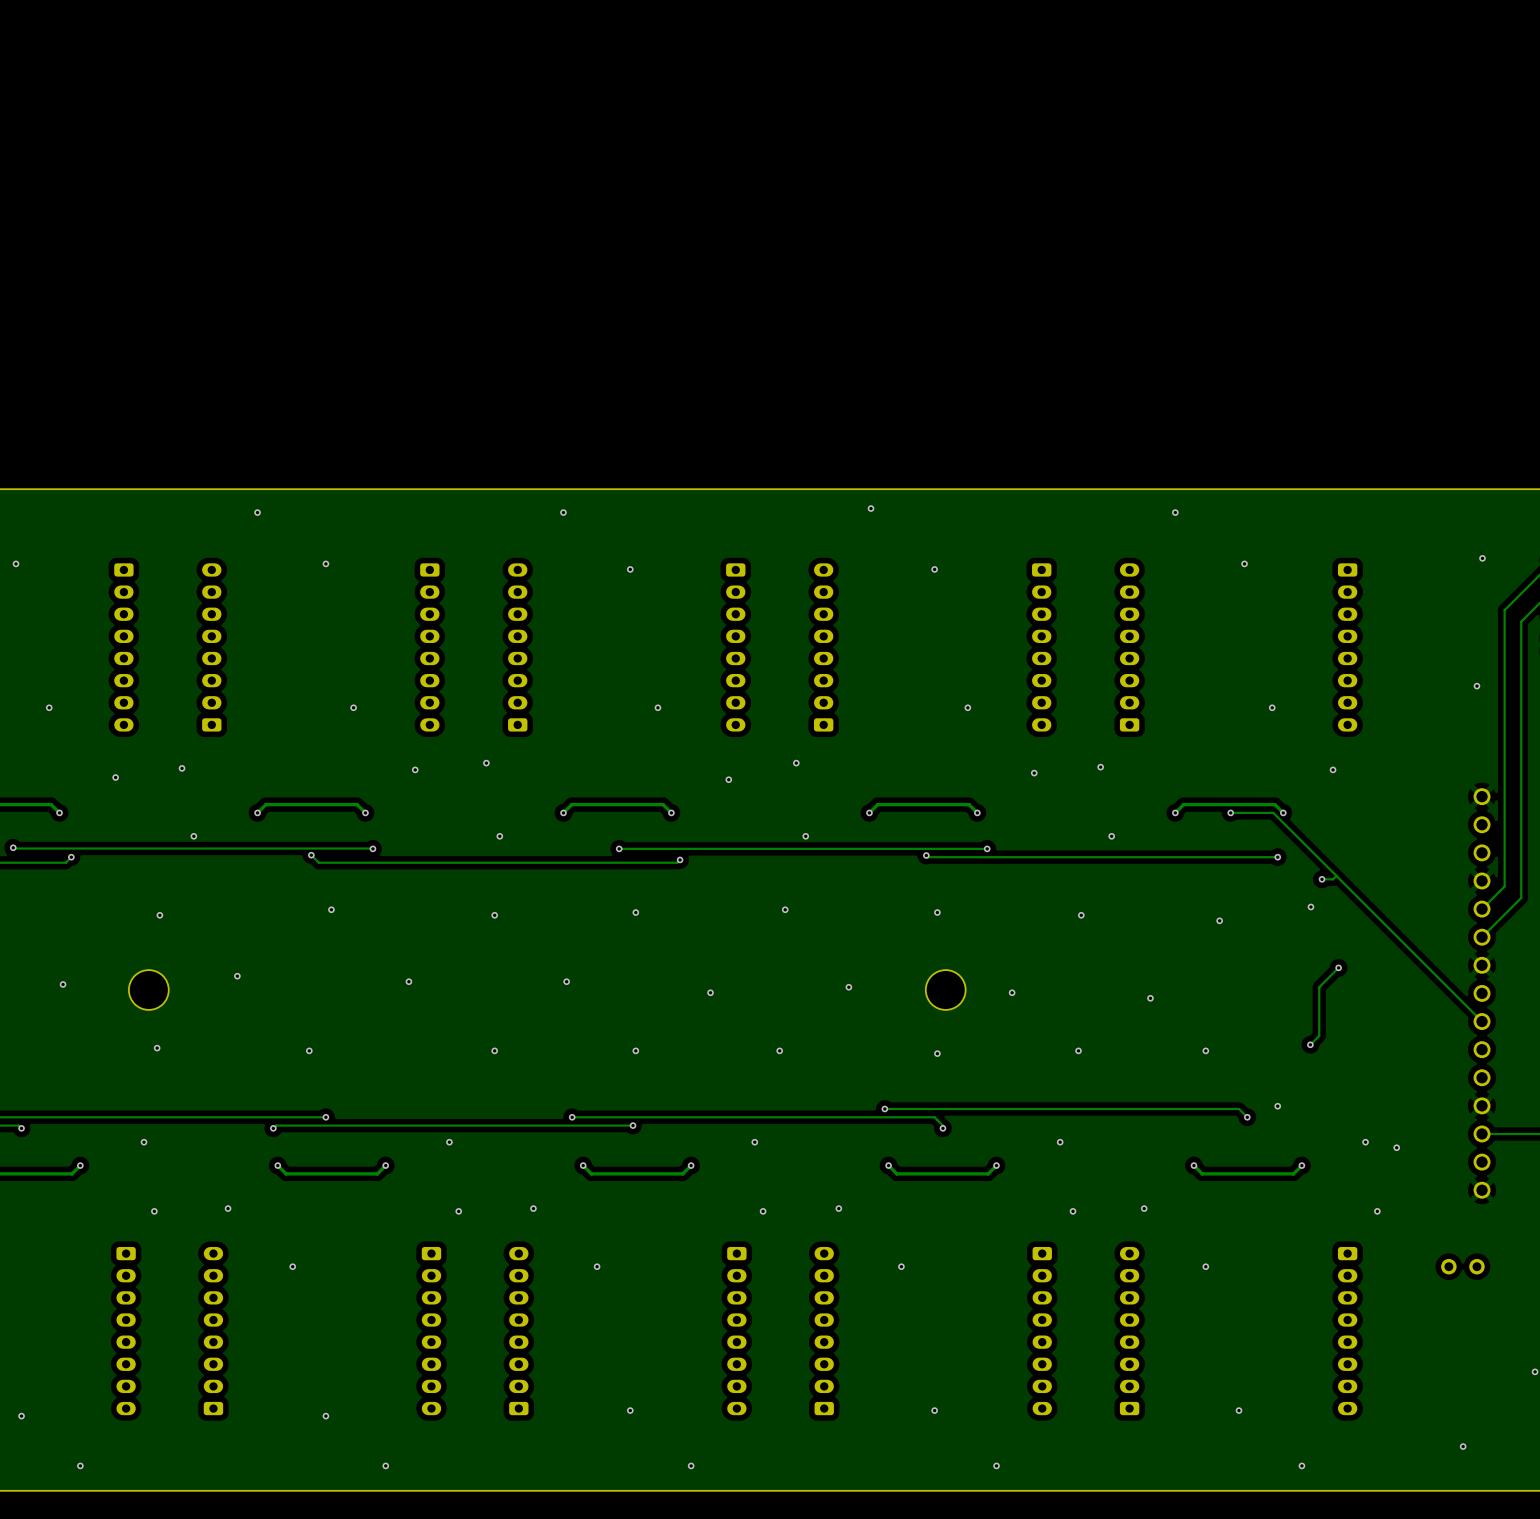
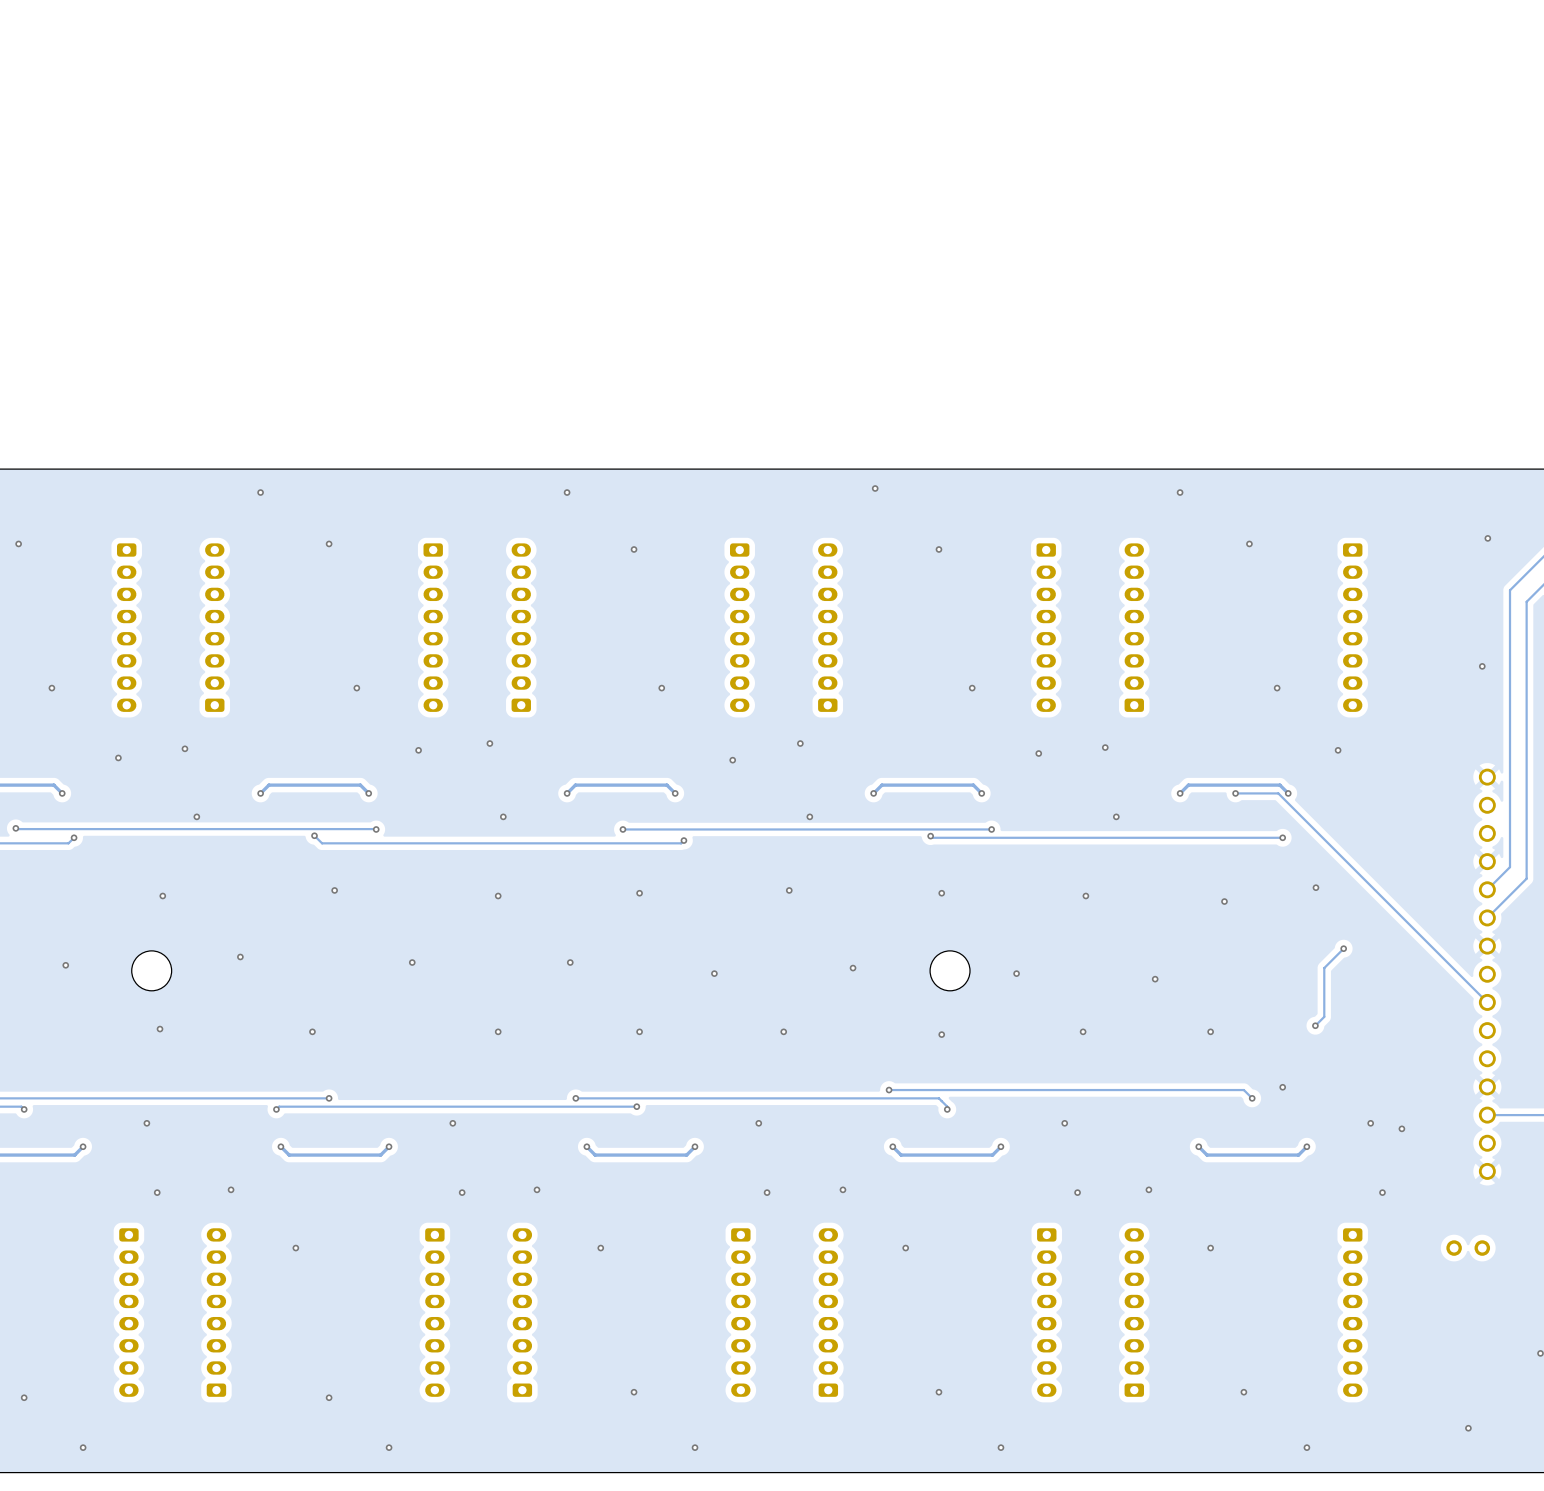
track: (1336, 875) (1333, 879) (1322, 879) -> none
via: (1322, 879) -> none

